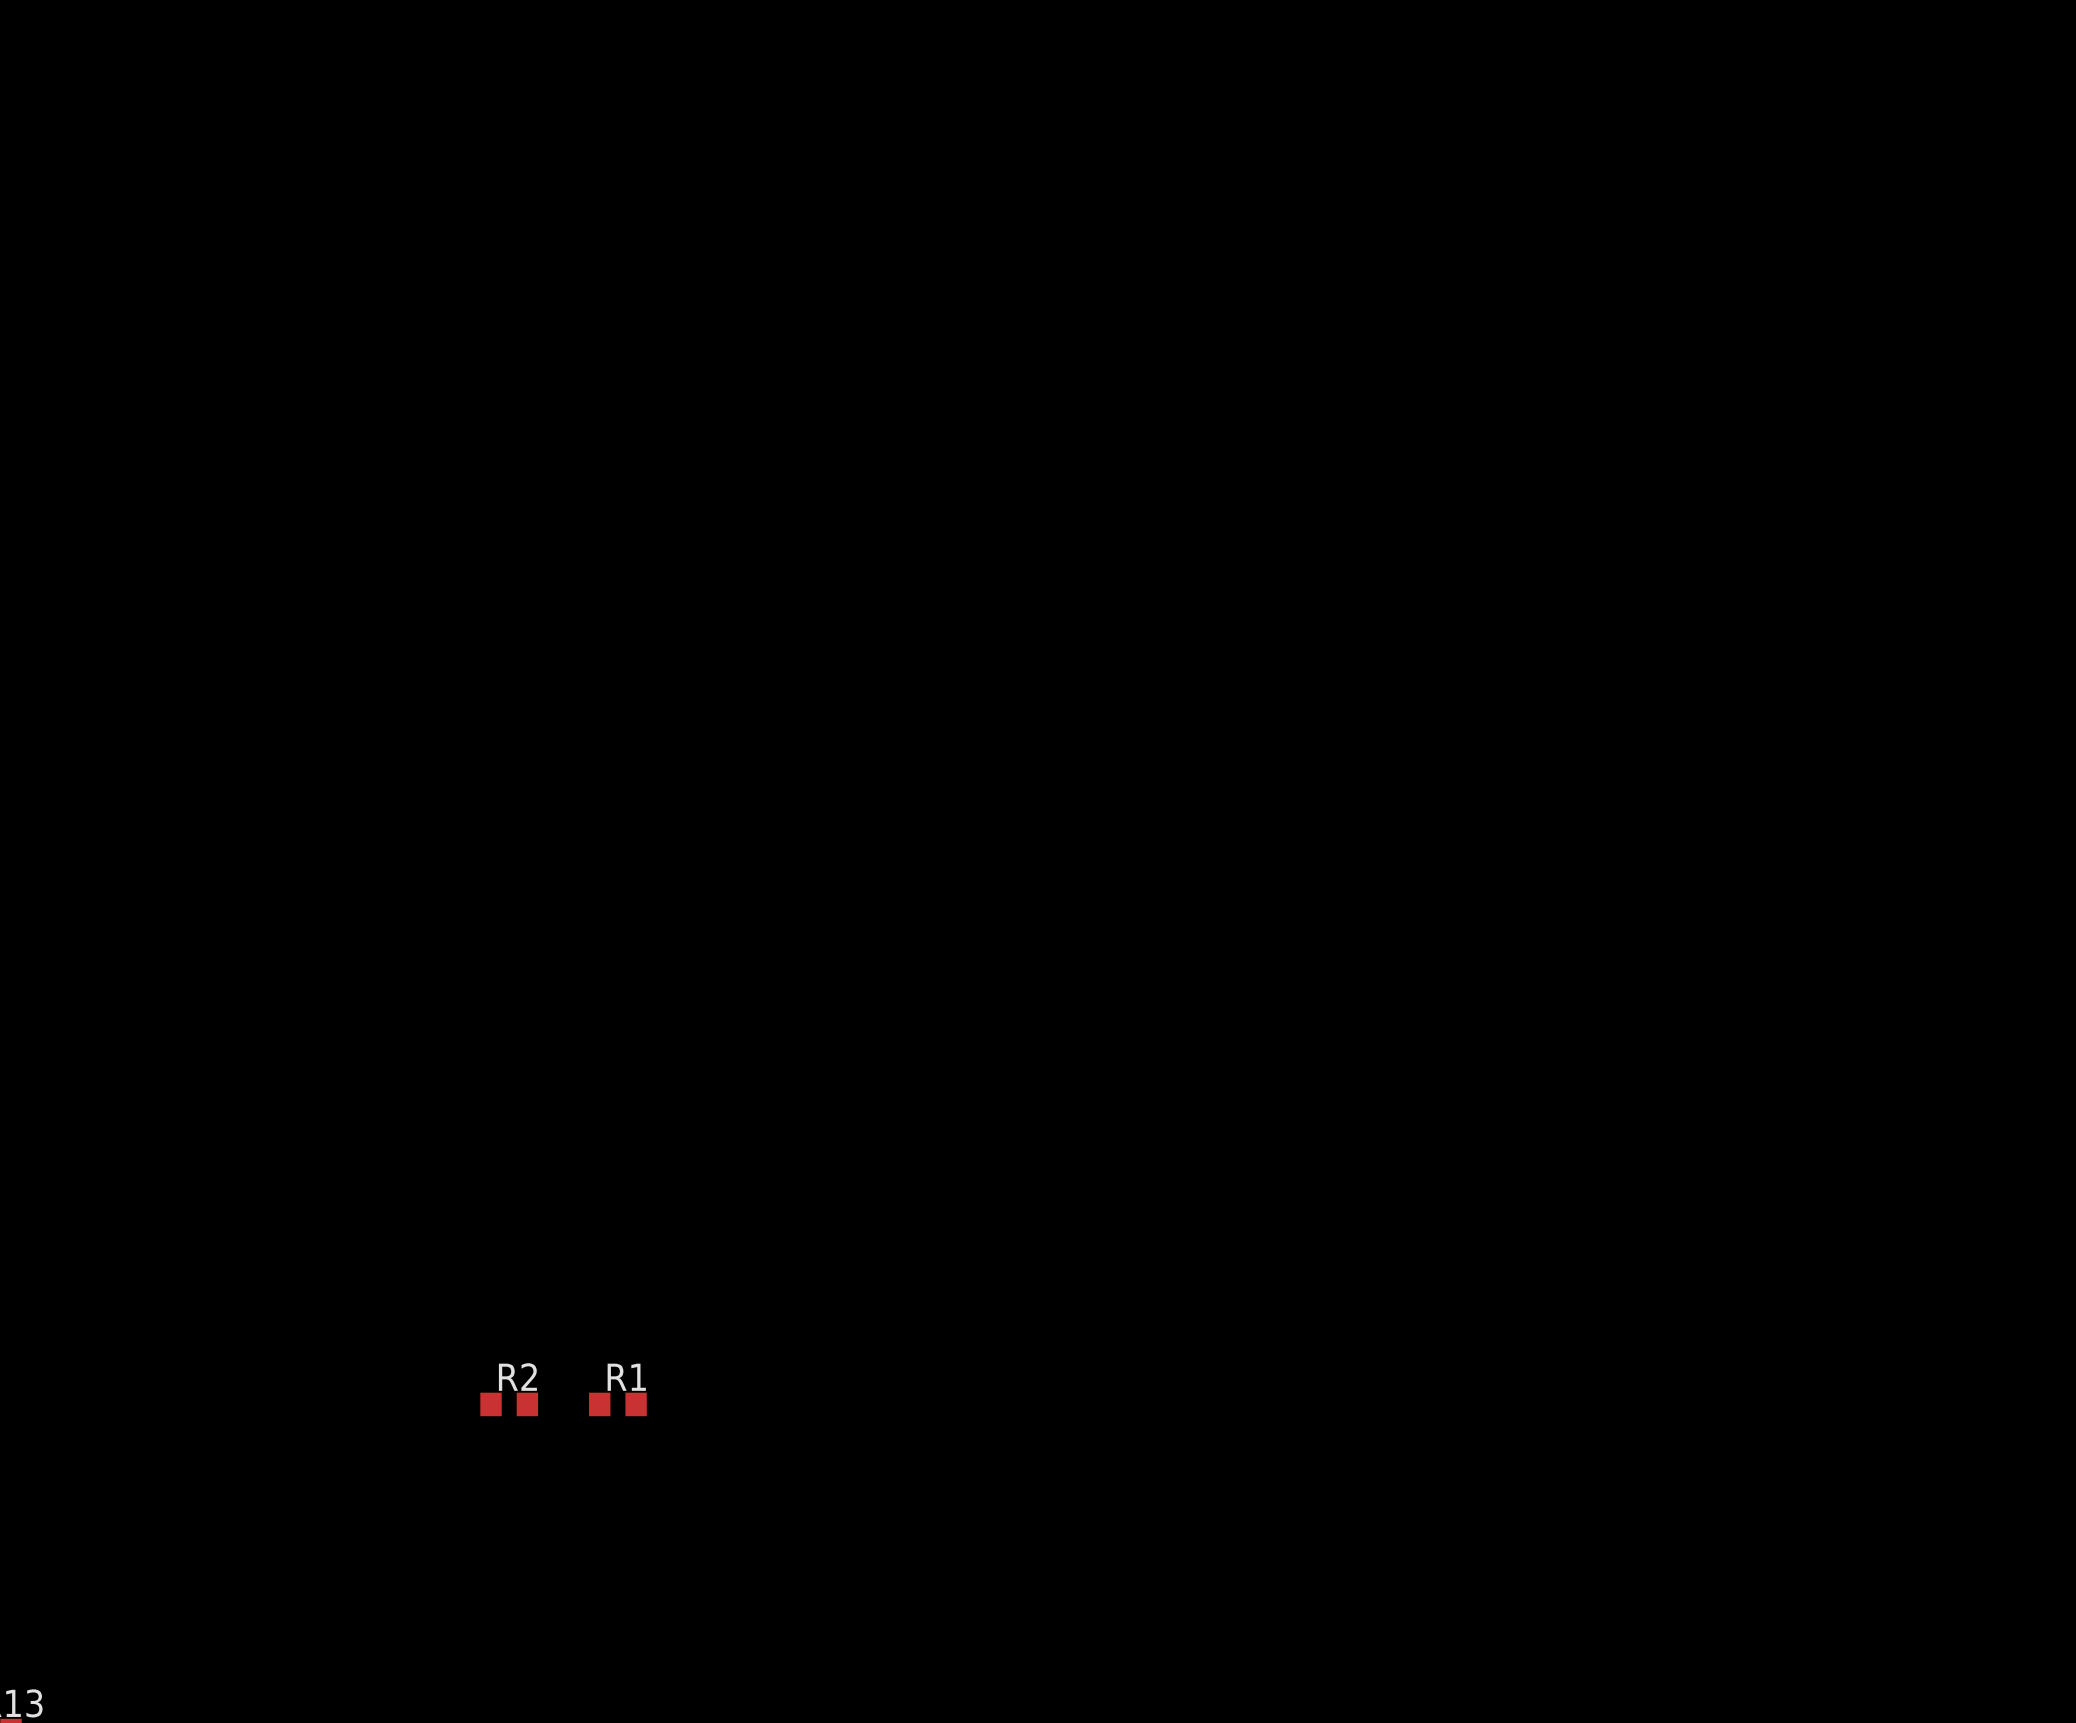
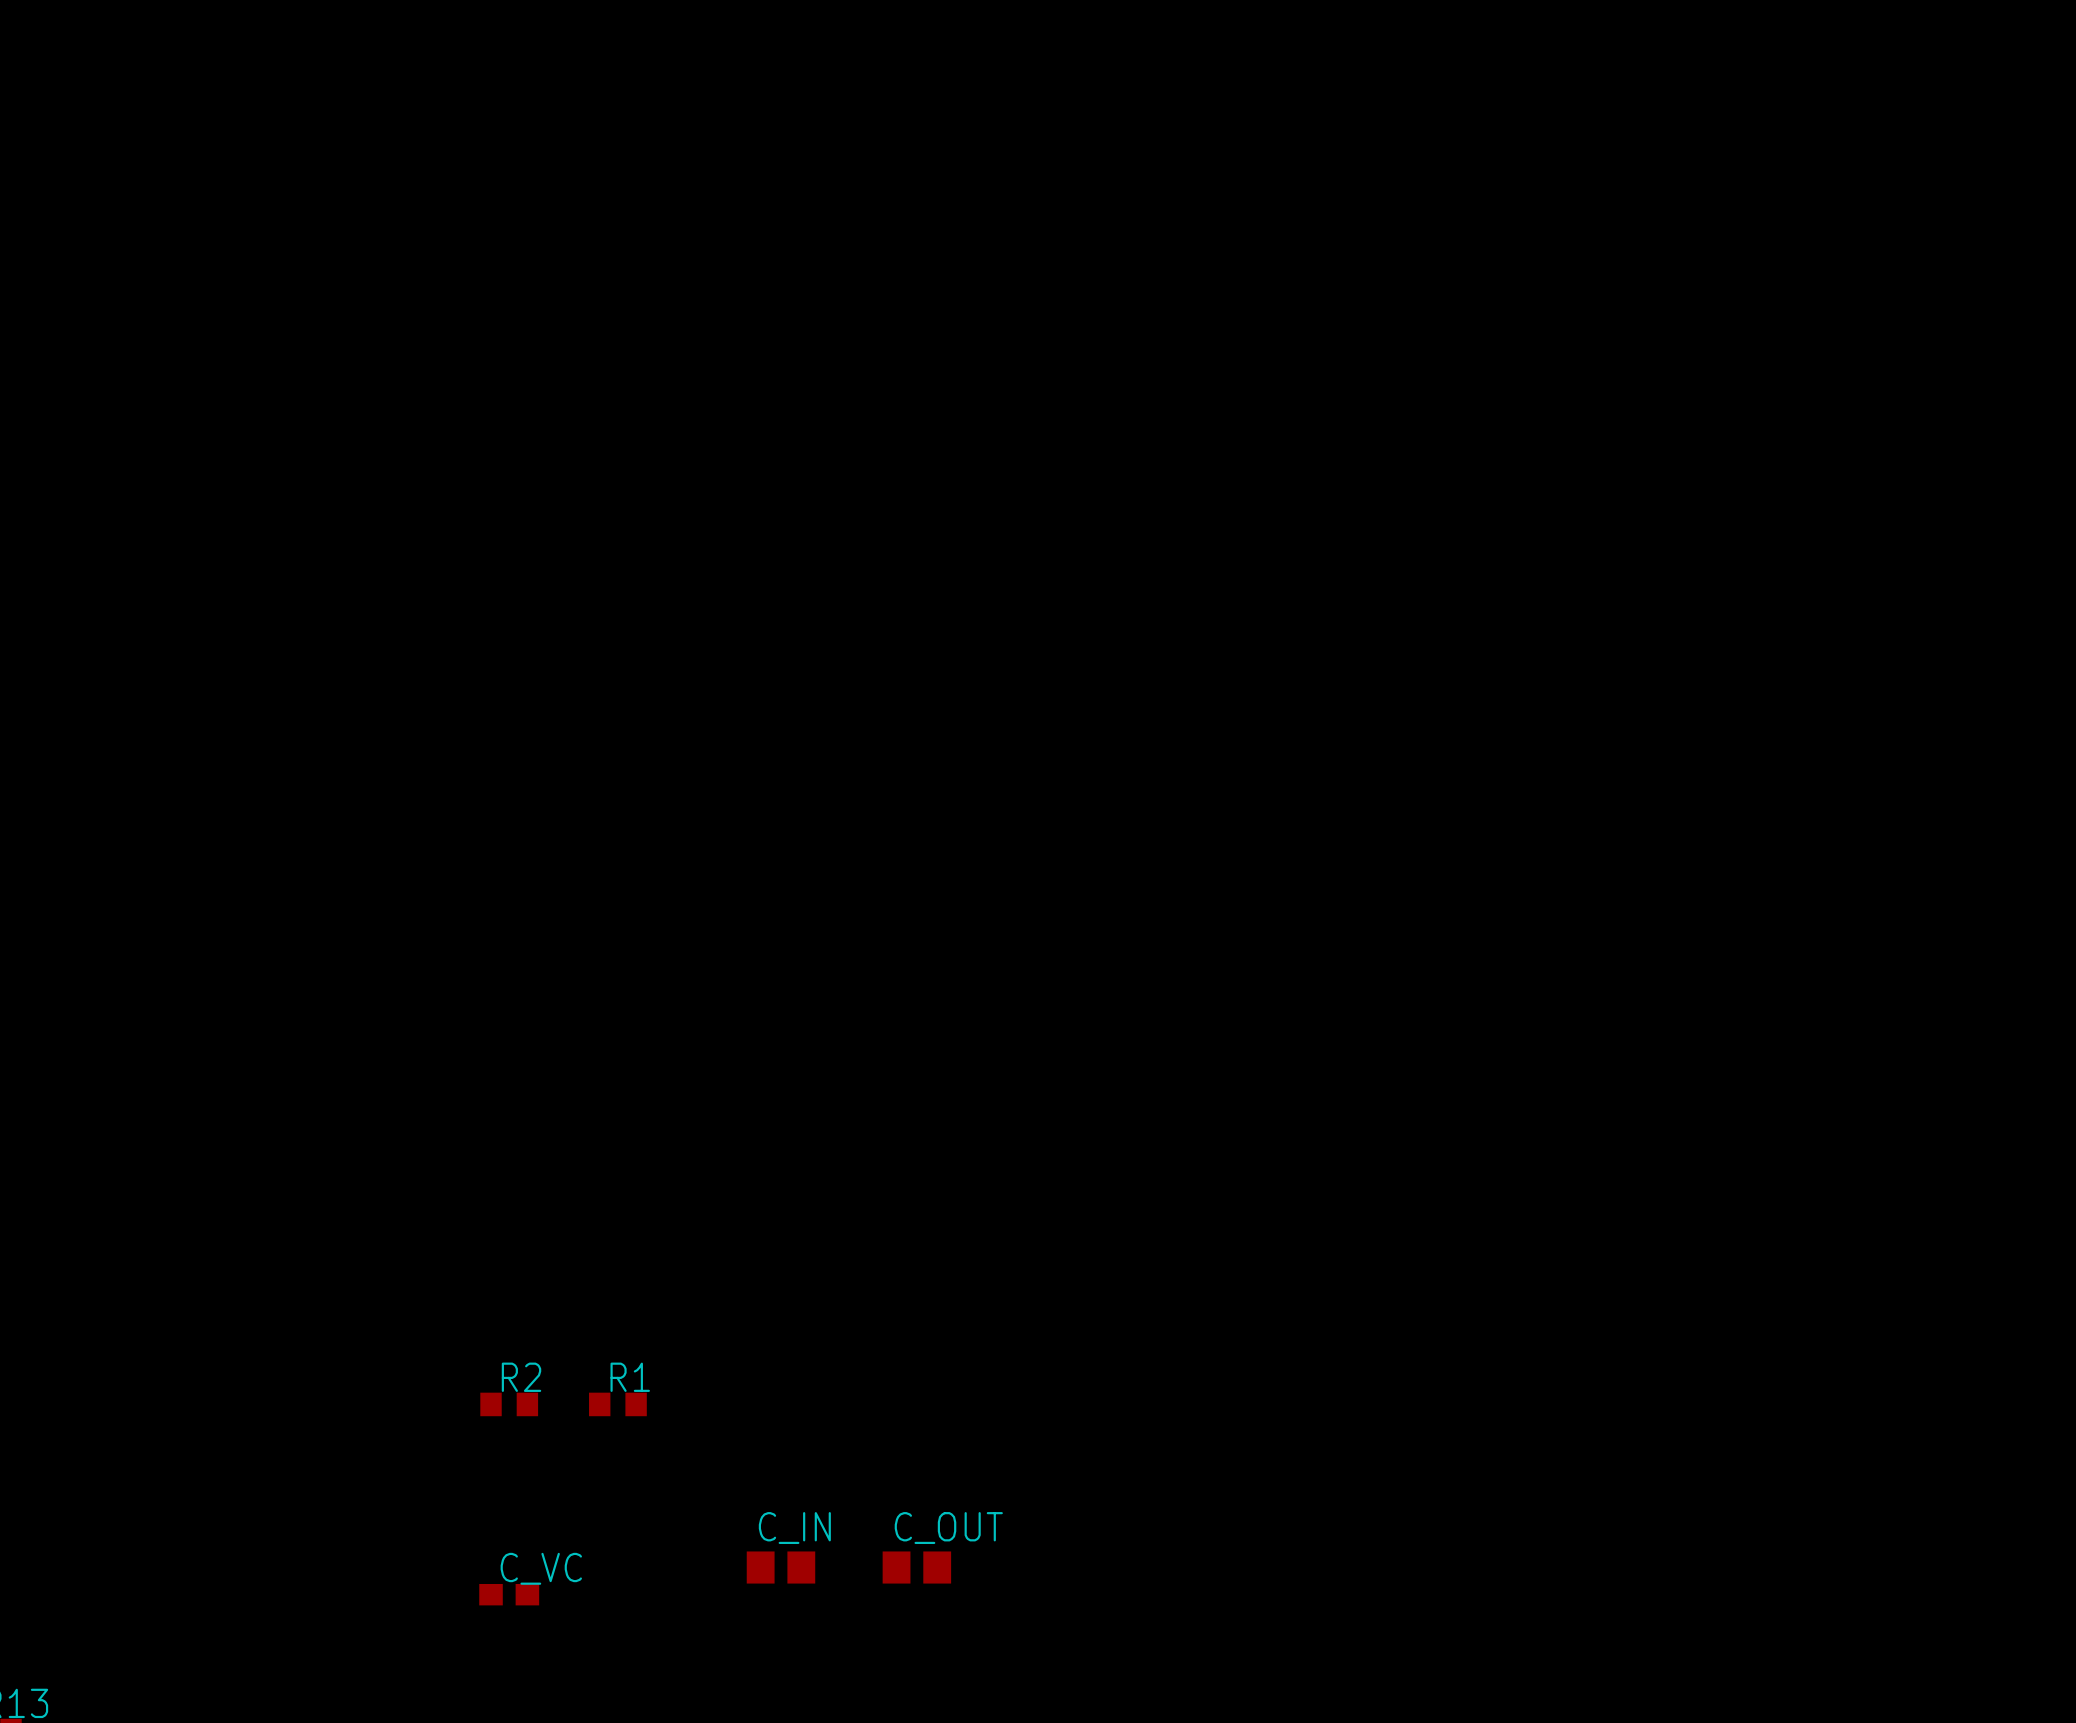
C_IN: none -> (780, 1567)
C_OUT: none -> (916, 1567)
C_VC: none -> (509, 1594)

